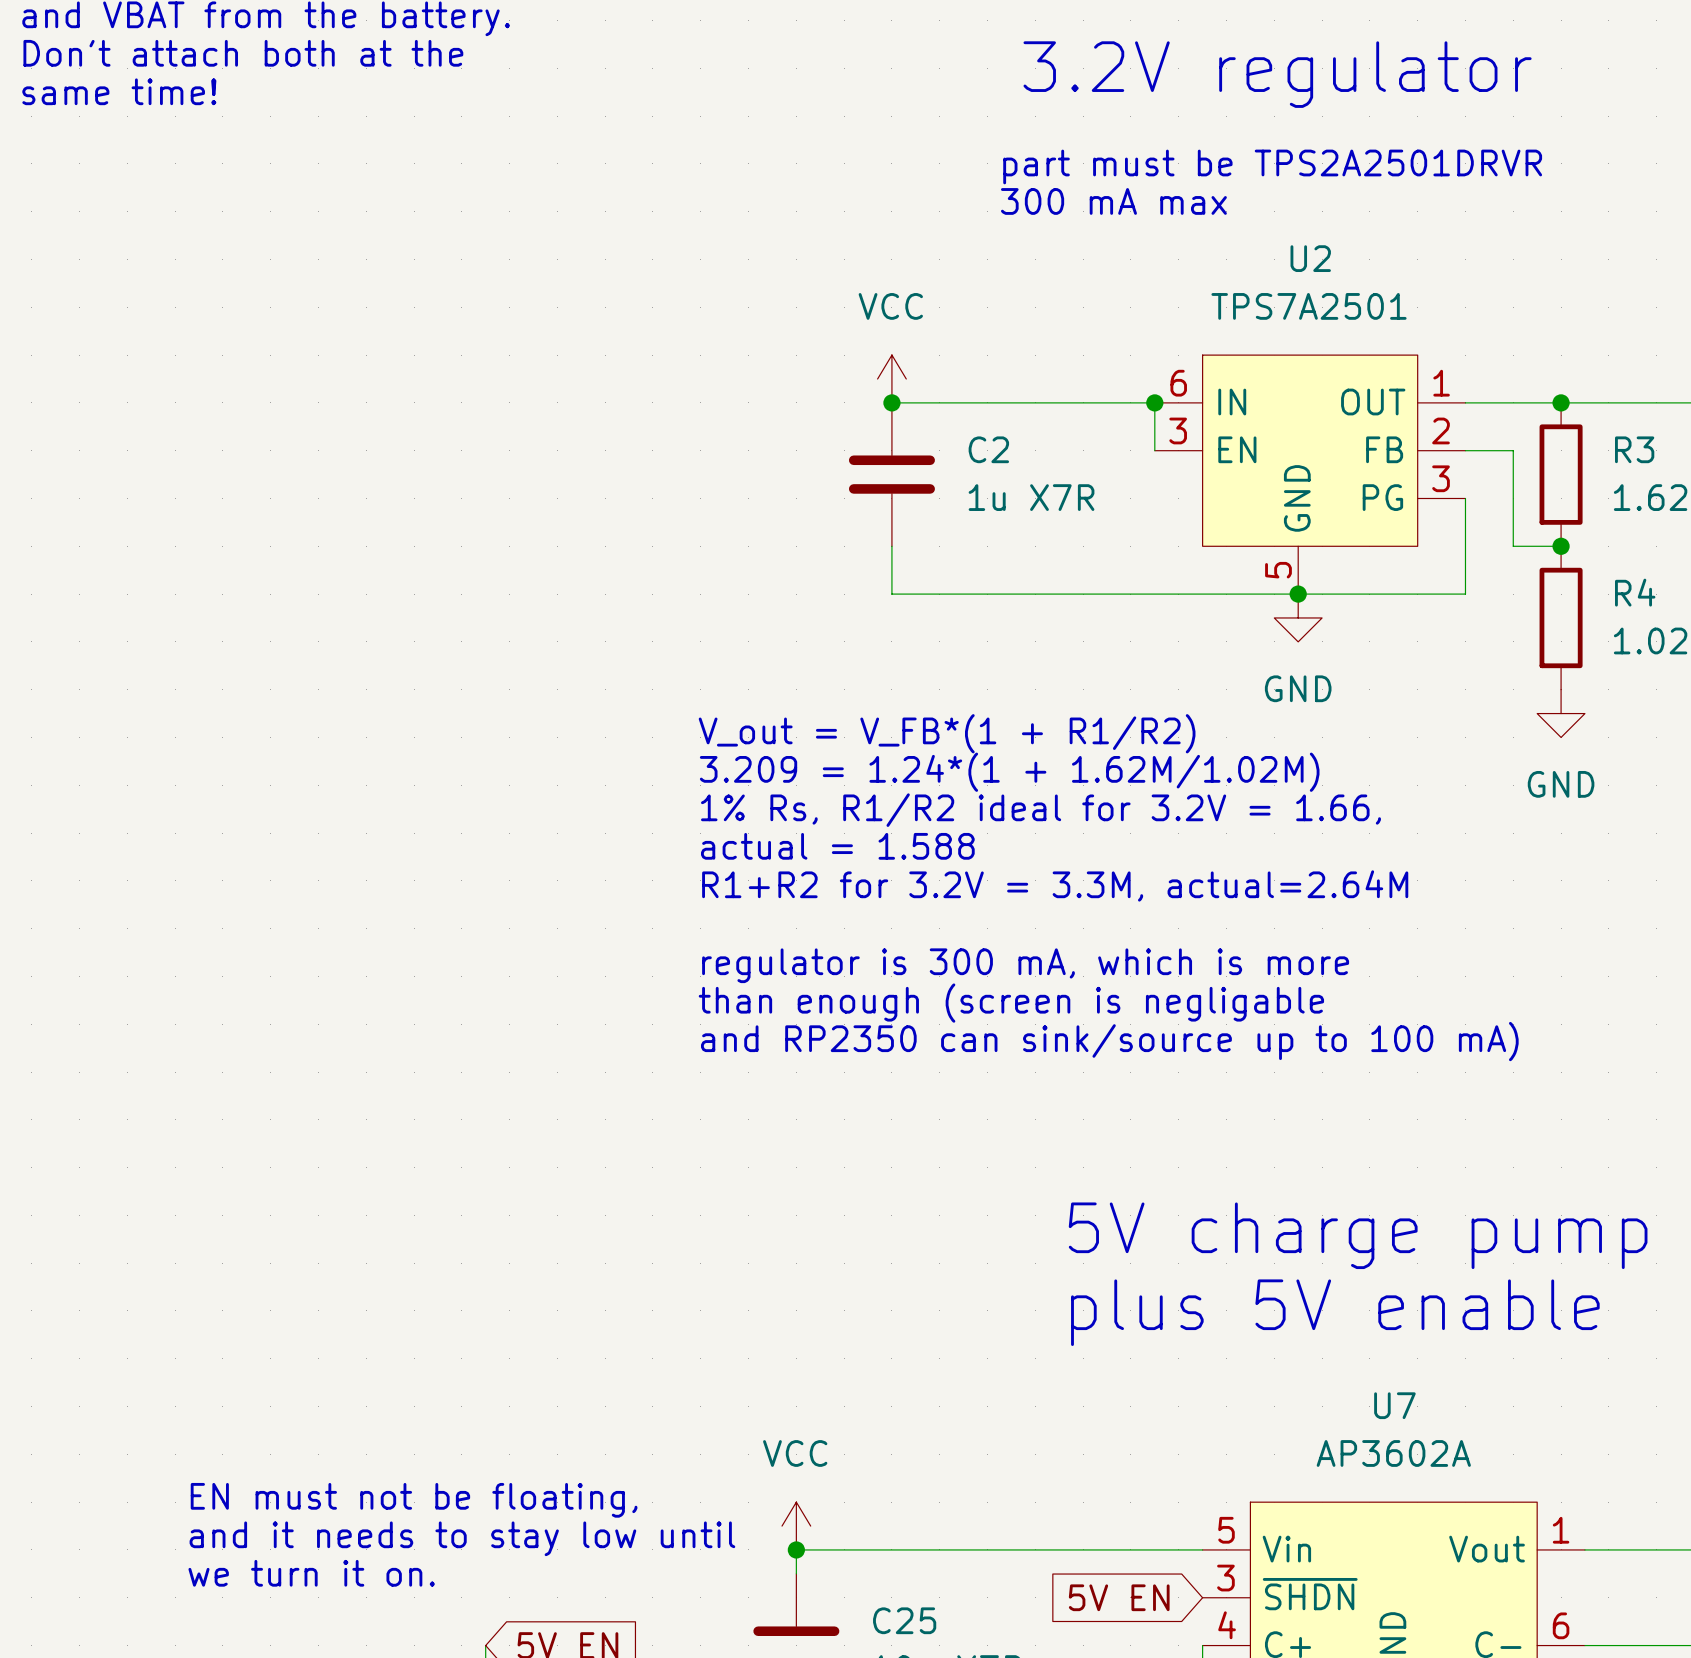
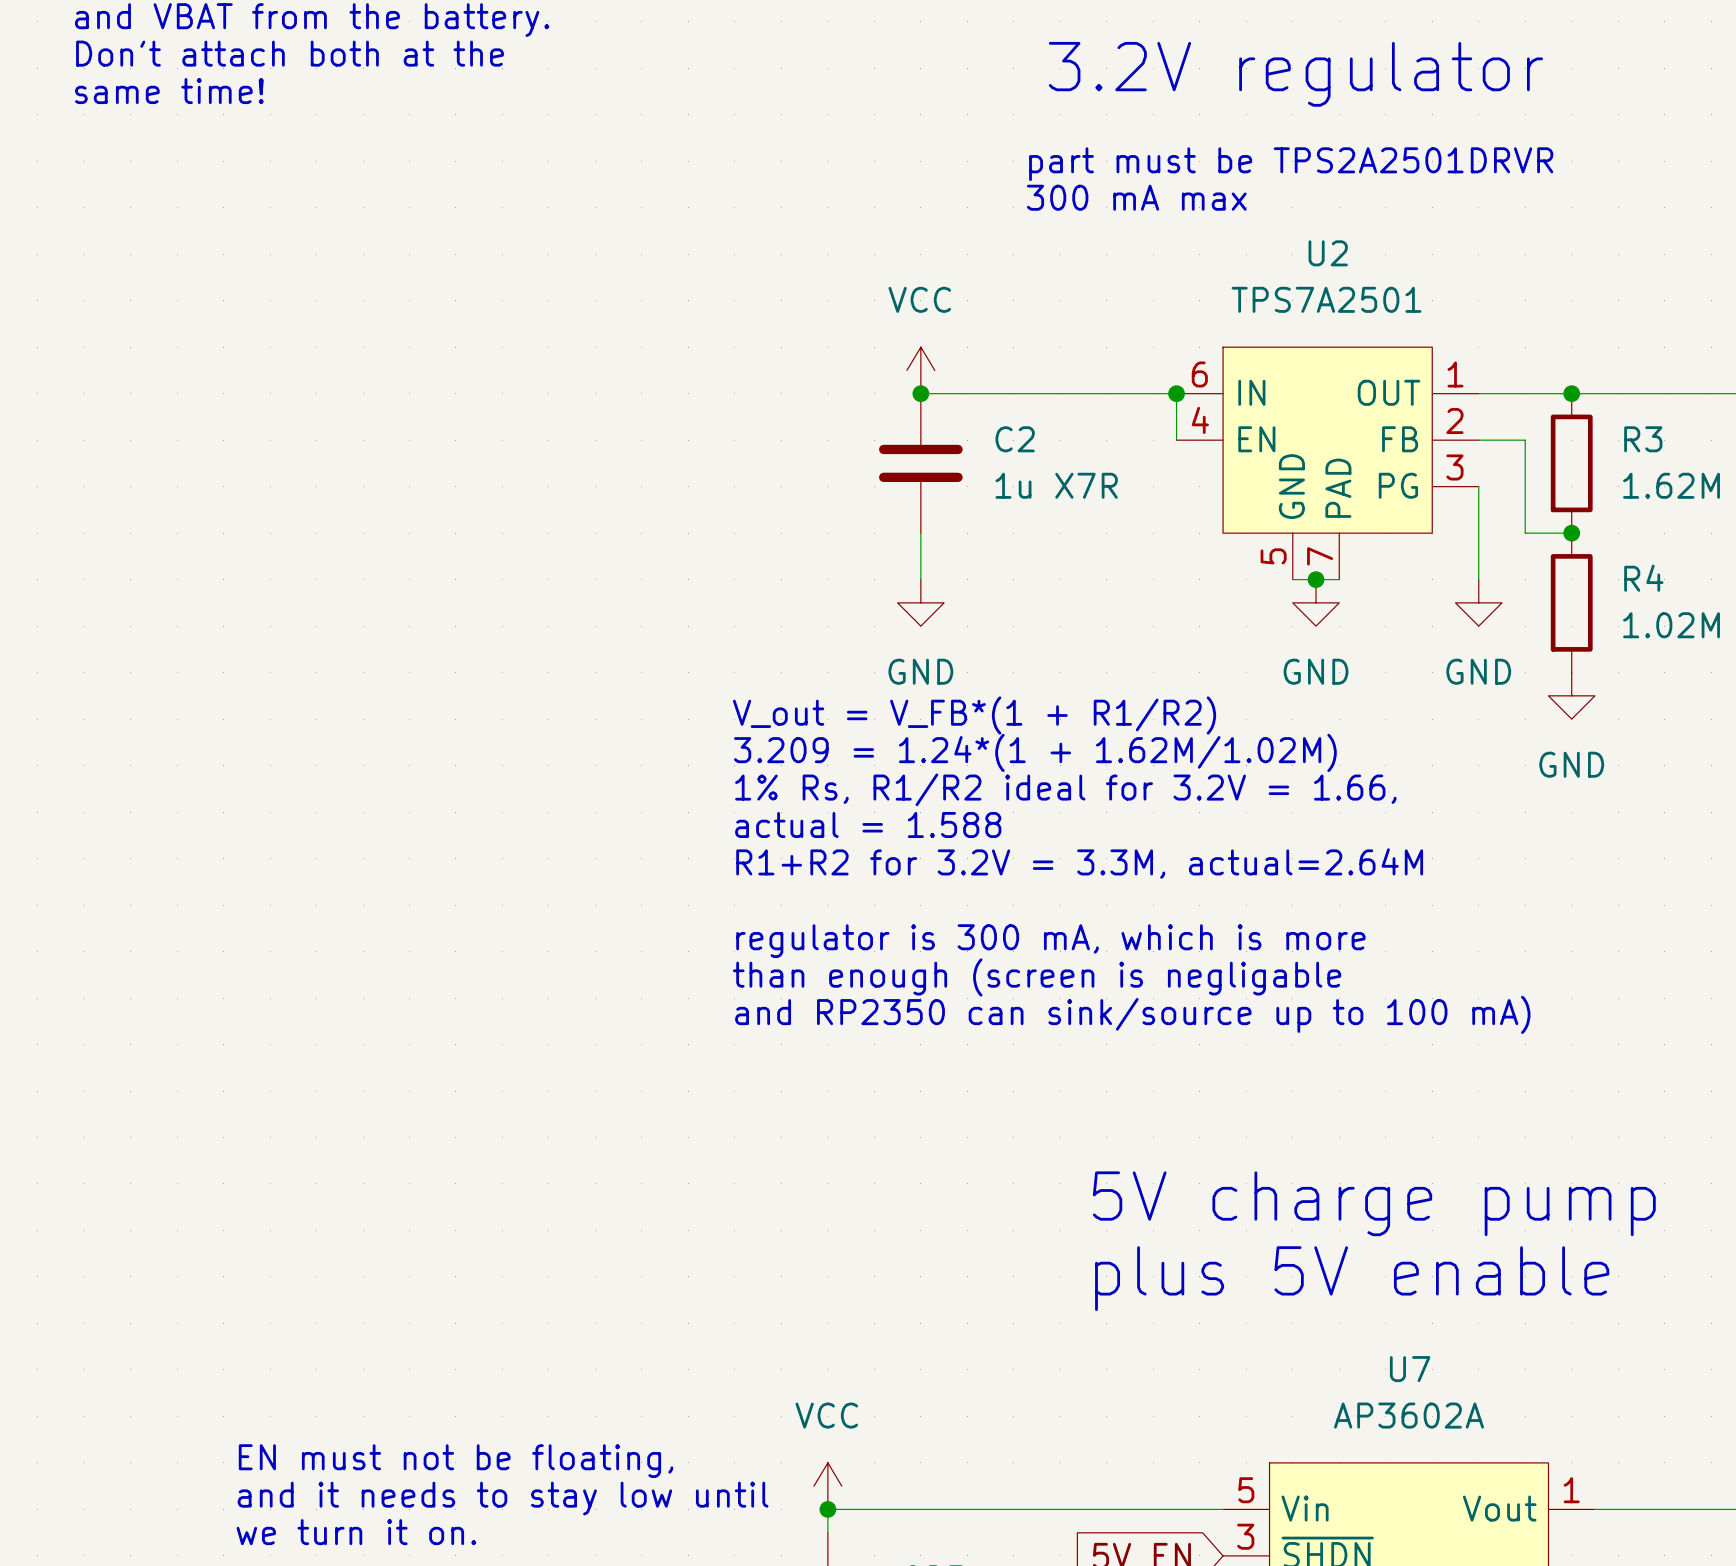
U2 symbol: [1154, 355, 1466, 595] -> [1176, 347, 1479, 580]
wire: (891, 594) (1274, 594) -> none
wire: (1322, 594) (1465, 594) -> none
power symbol: none -> GND (920, 602)
power symbol: none -> GND (1478, 602)

